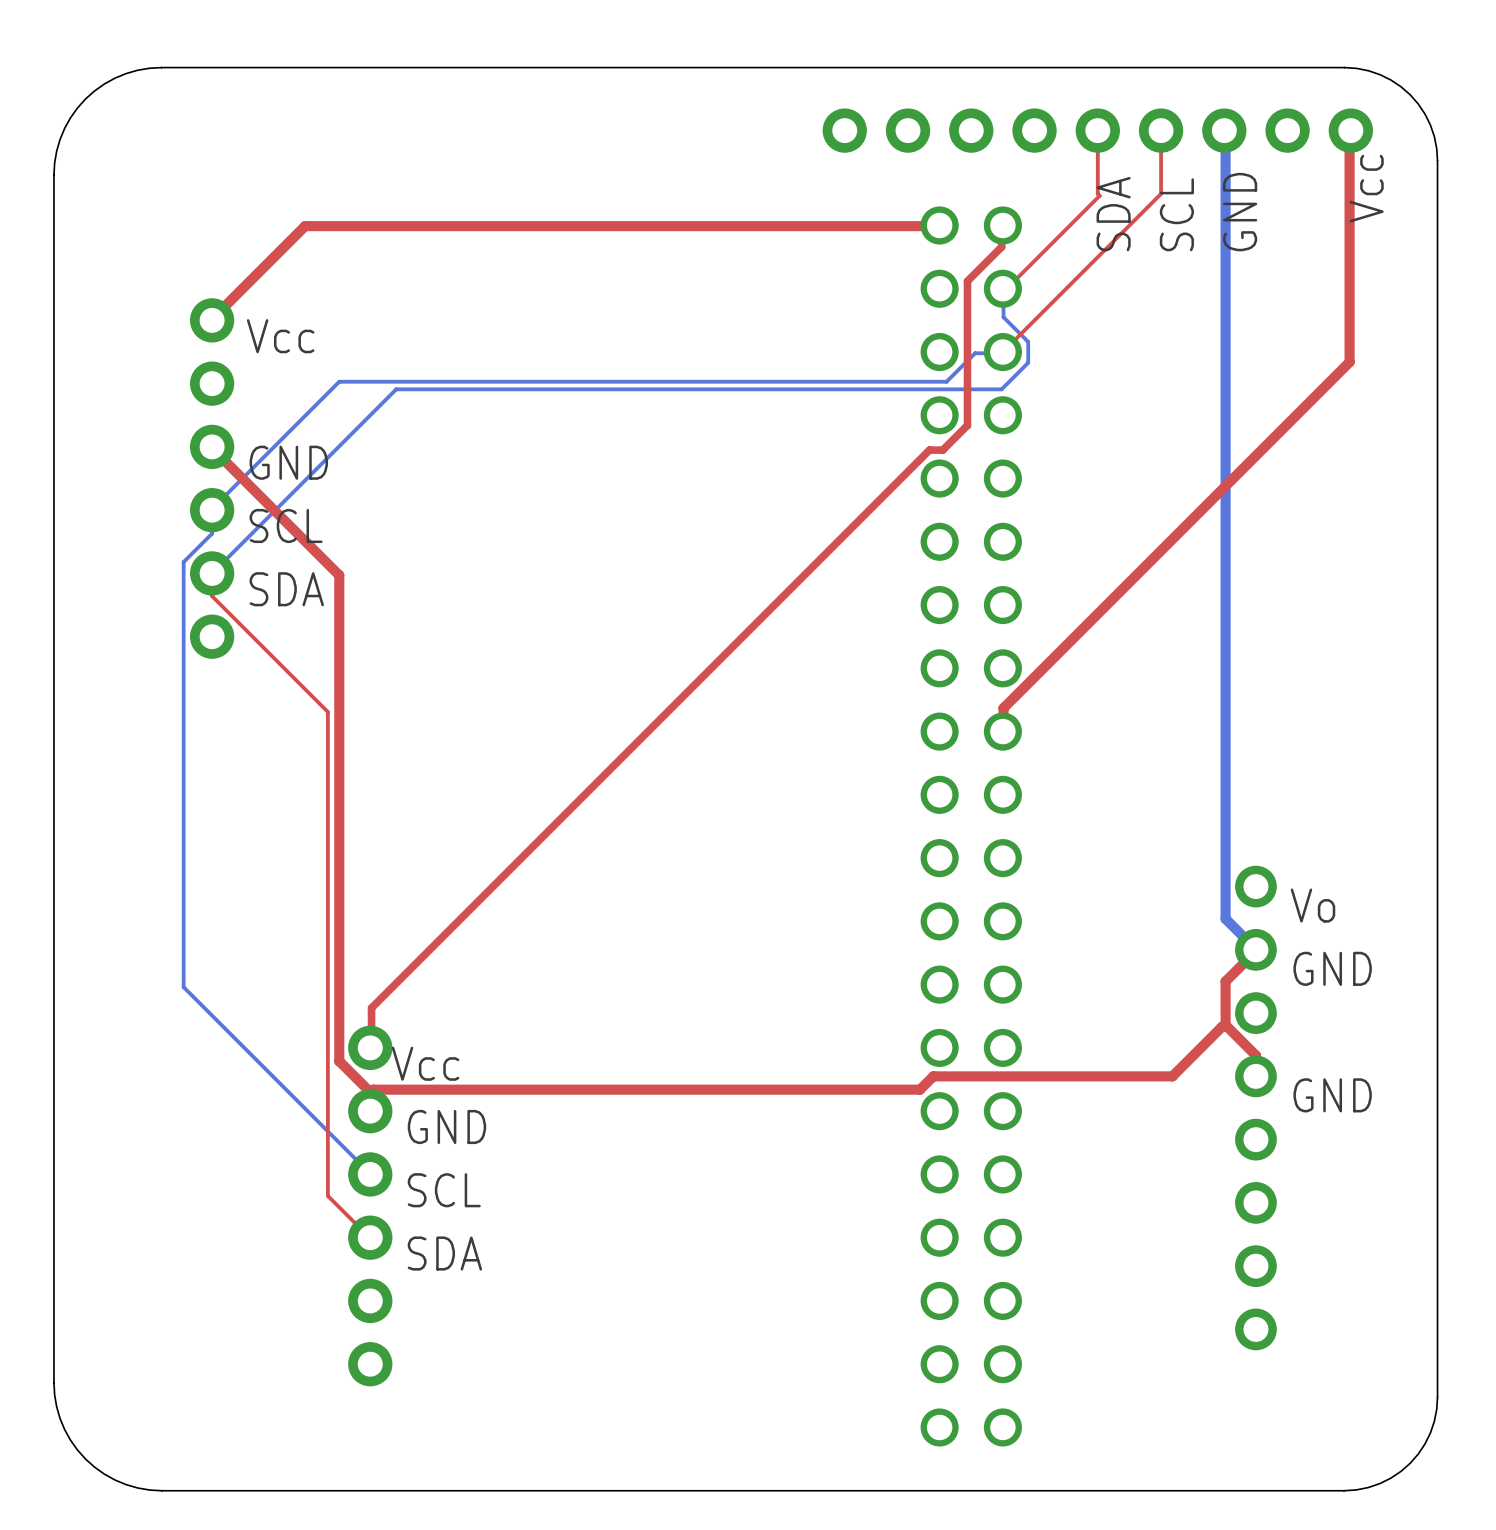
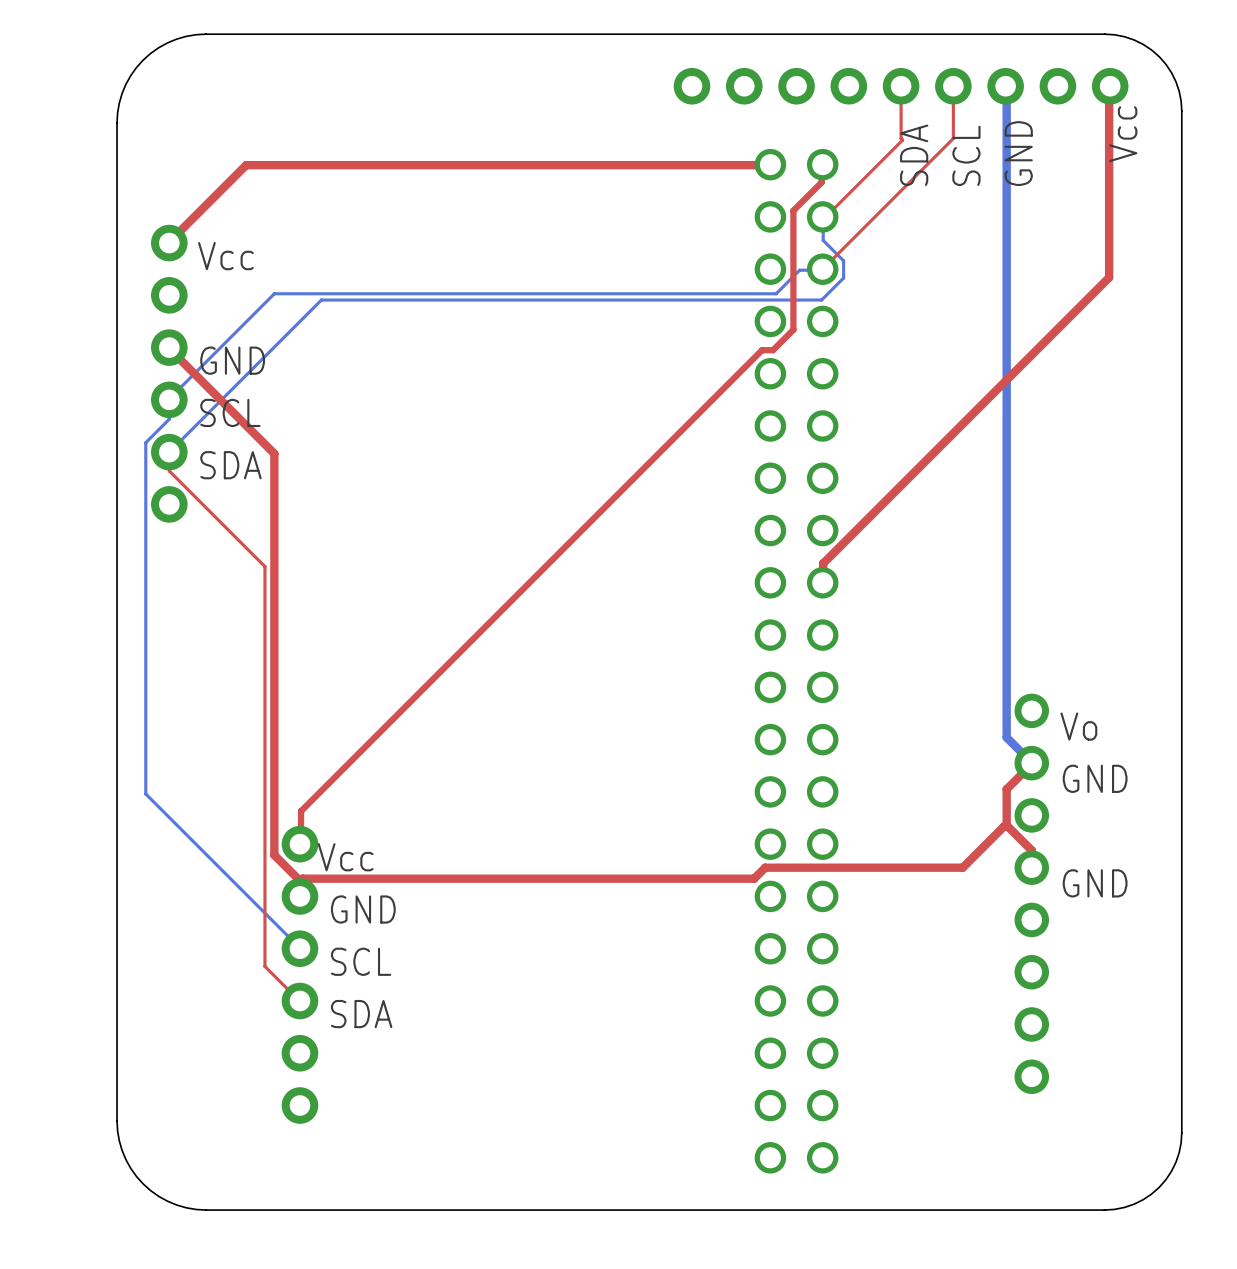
board edge: (256, 67) (149, 68) (114, 78) (85, 99) (70, 117) (60, 139) (54, 163) (53, 1382) (60, 1418) (70, 1440) (85, 1459) (115, 1480) (149, 1490) (256, 1490) -> (205, 34) (176, 39) (150, 53) (136, 67) (125, 84) (117, 113) (117, 1120) (122, 1150) (130, 1168) (143, 1183) (158, 1196) (176, 1205) (206, 1210)

